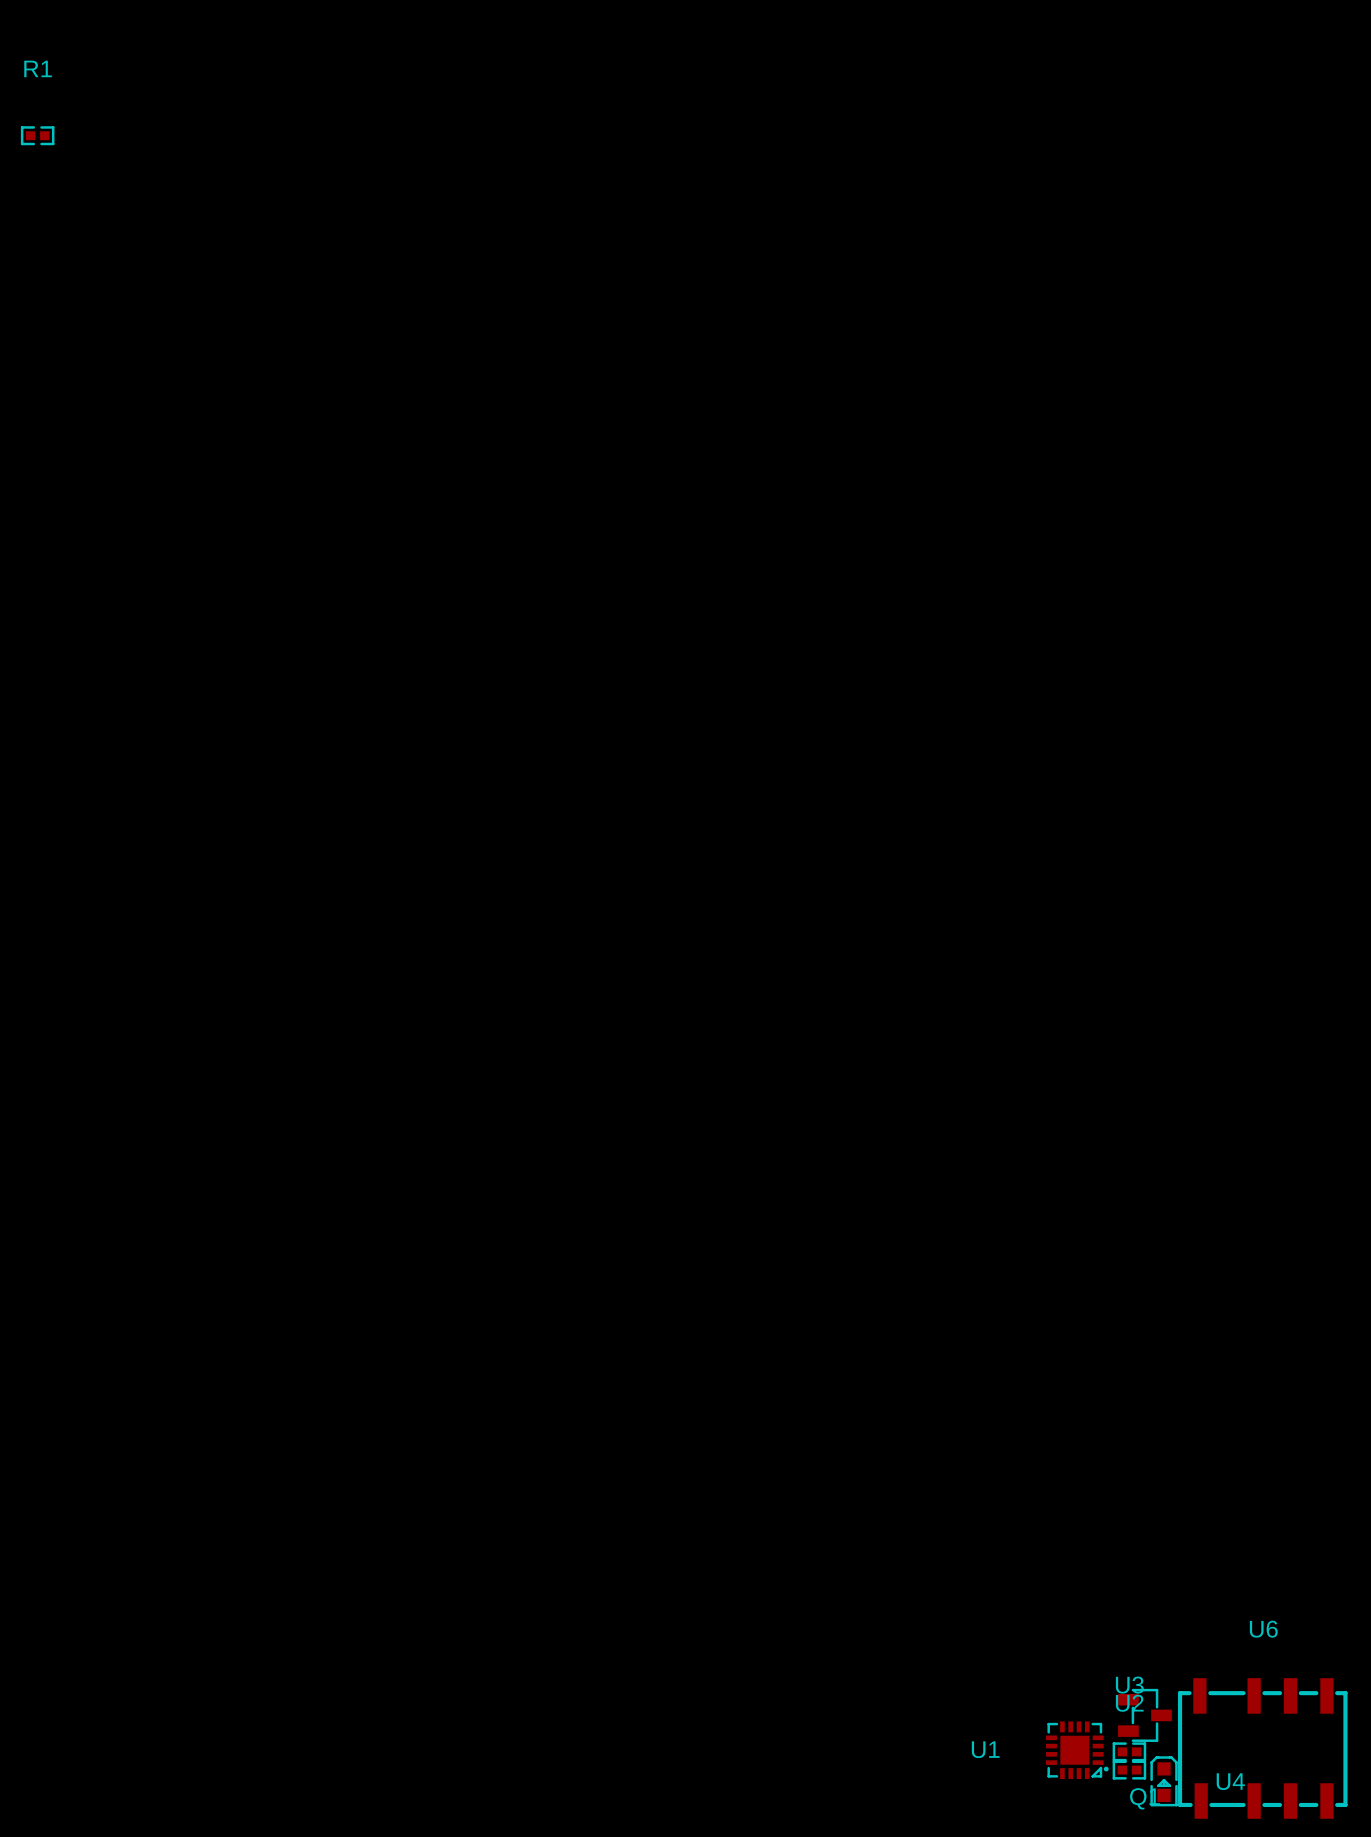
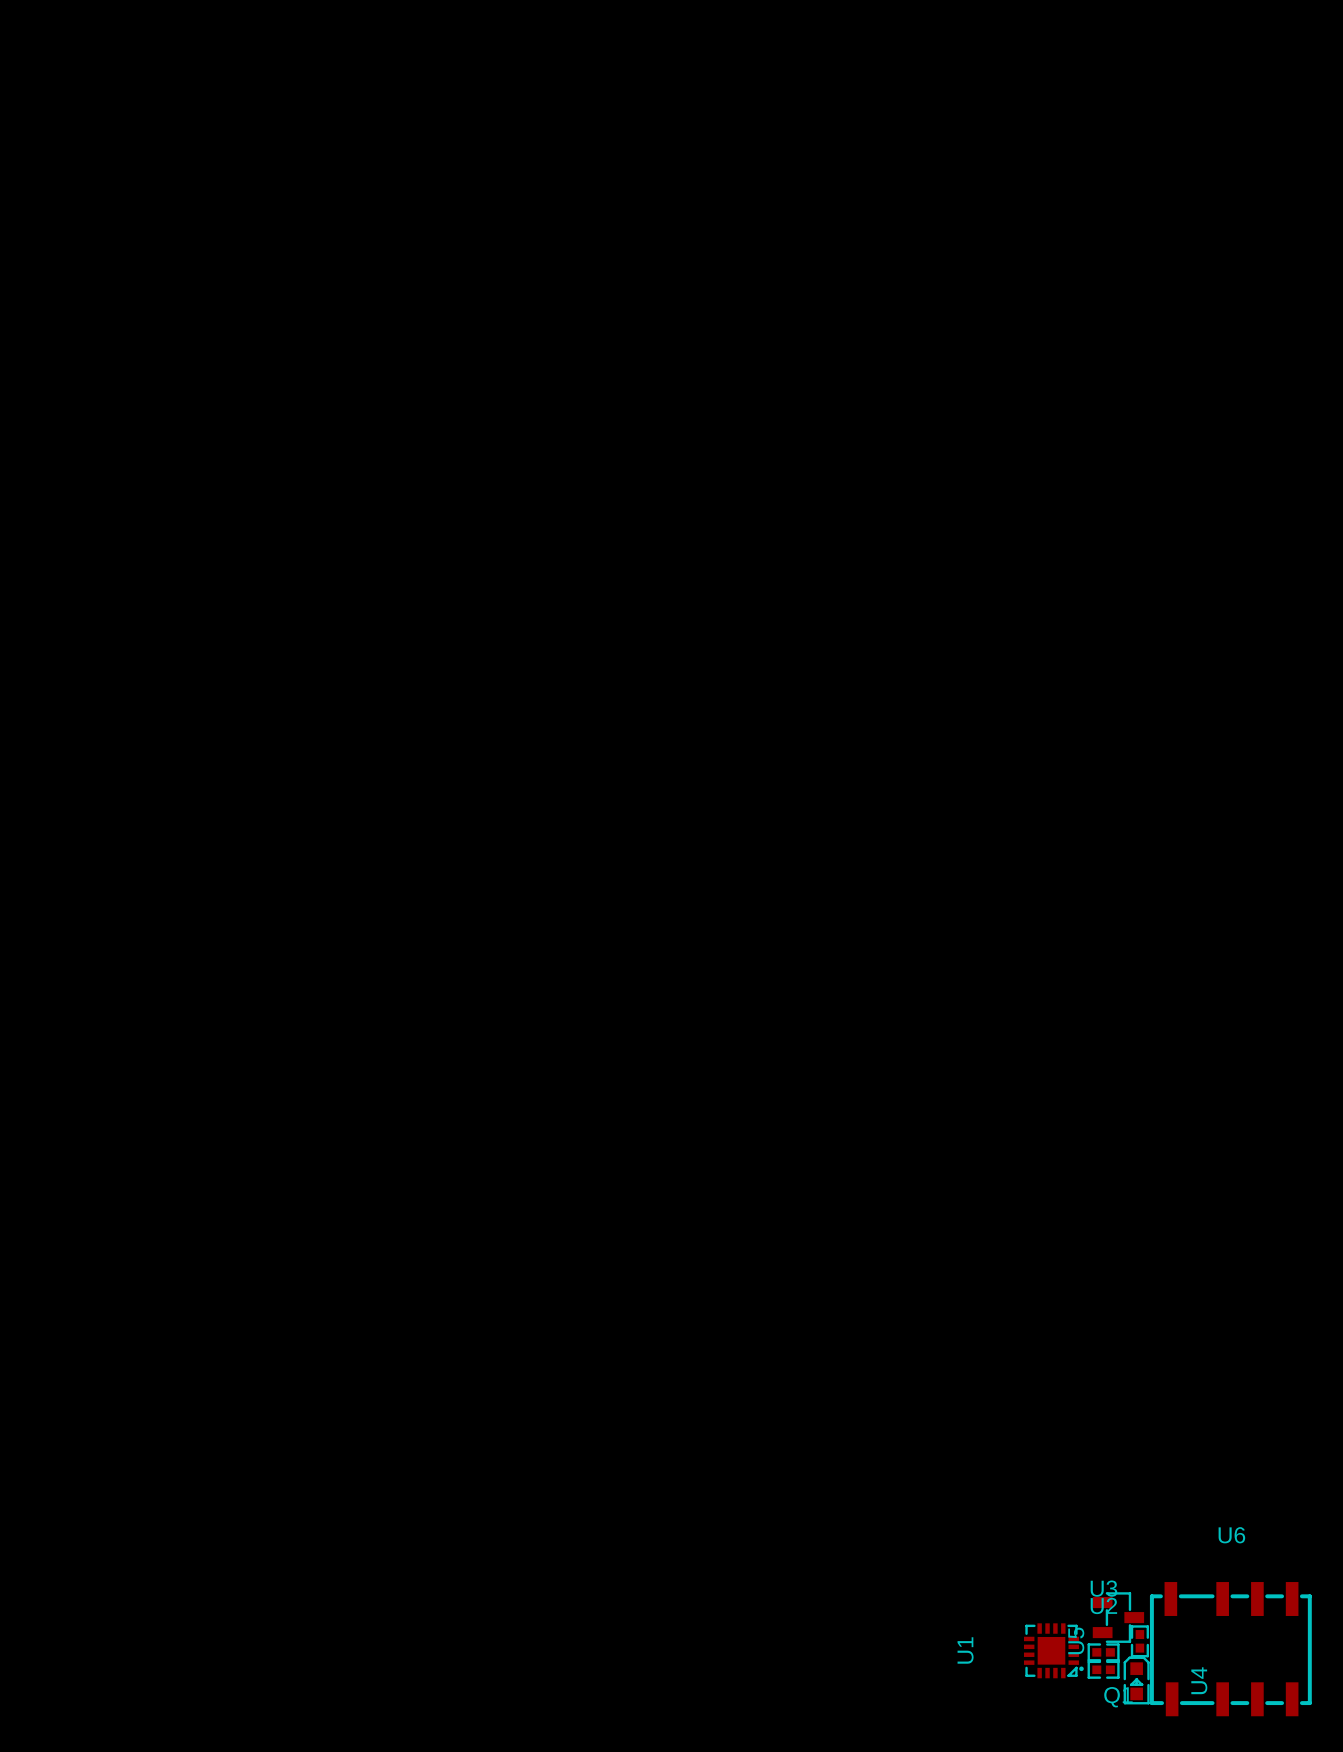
R1: (37, 135) -> none
U5: none -> (1139, 1641)
U1 name rotation: 0° (985, 1749) -> 90° counterclockwise (965, 1650)
U4 name rotation: 0° (1230, 1781) -> 90° counterclockwise (1199, 1680)

